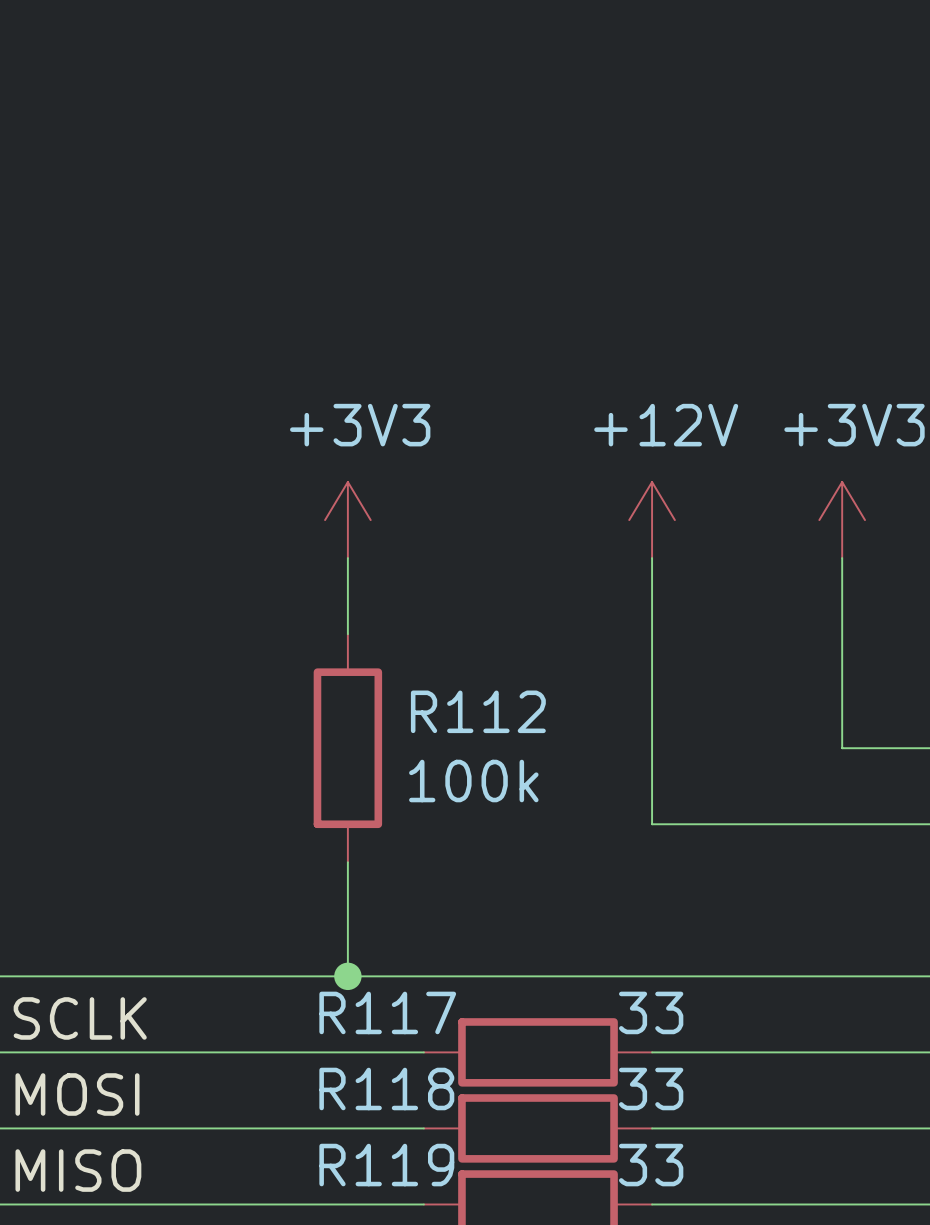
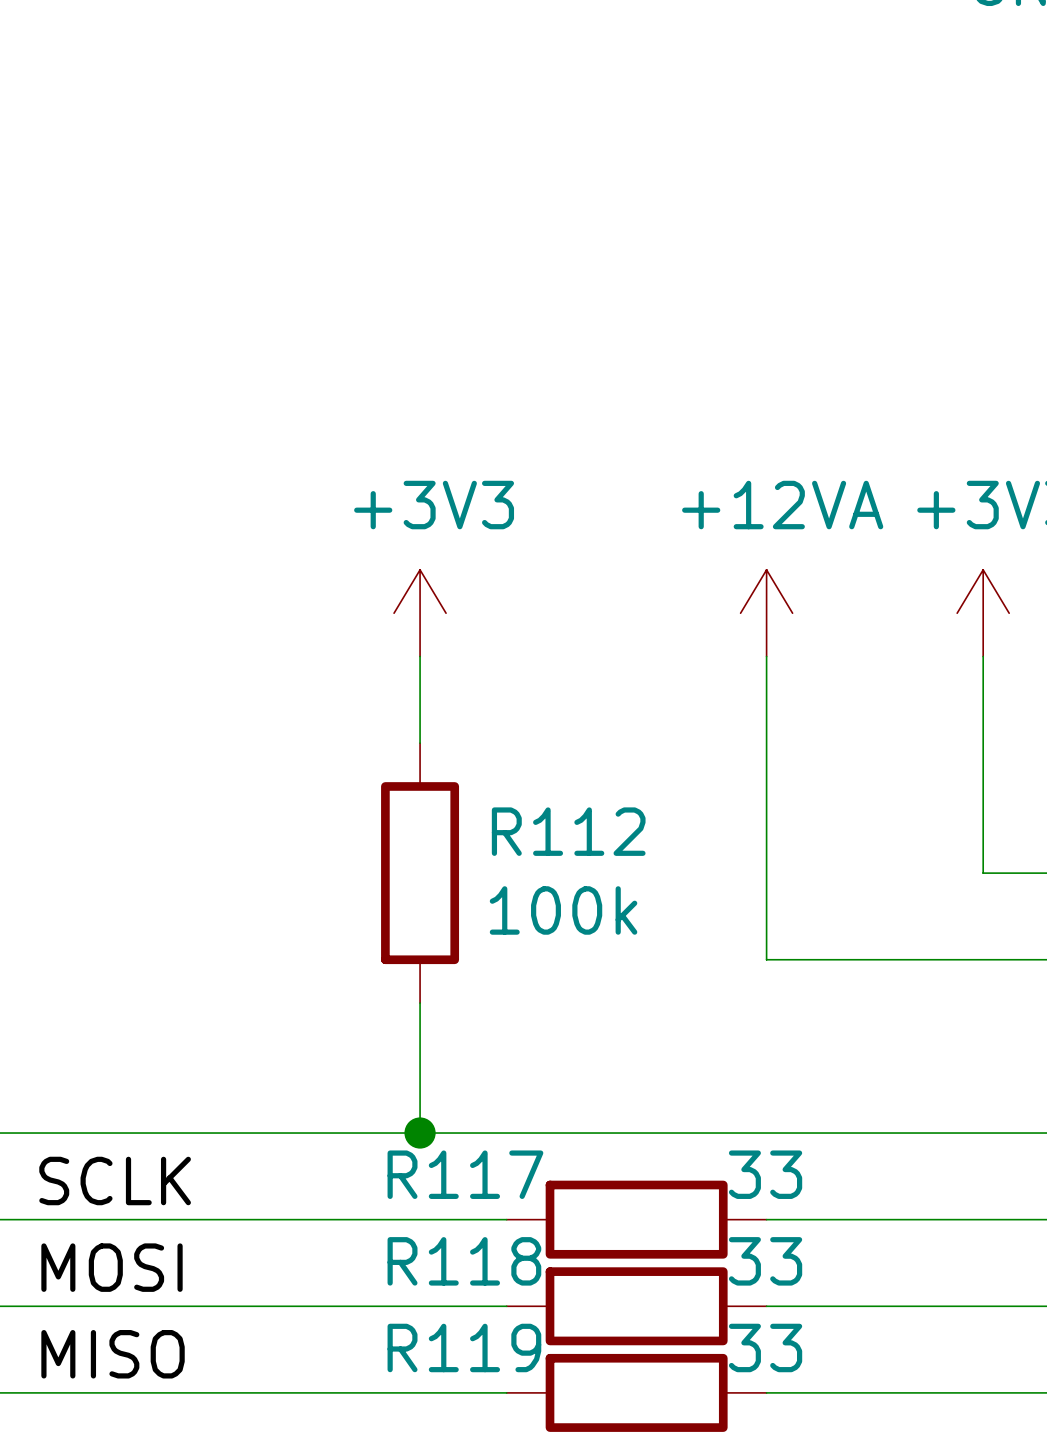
power symbol: +12V (652, 520) -> +12VA (766, 613)

